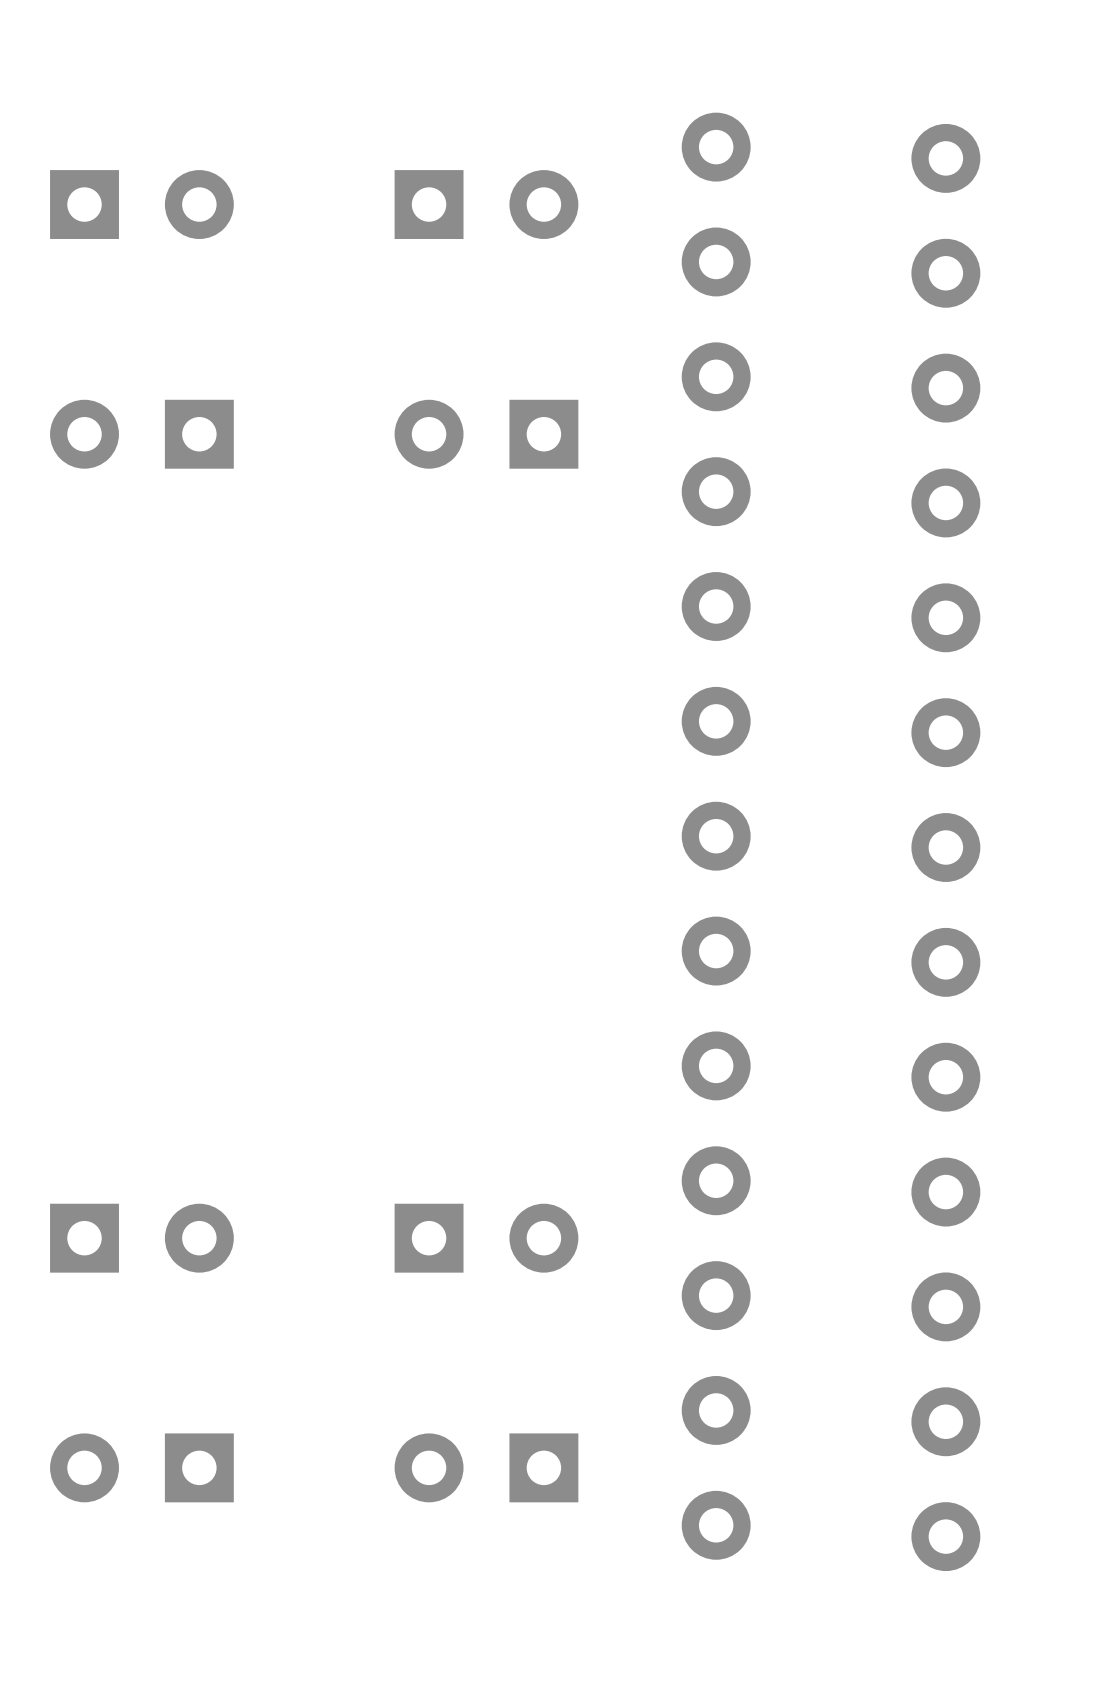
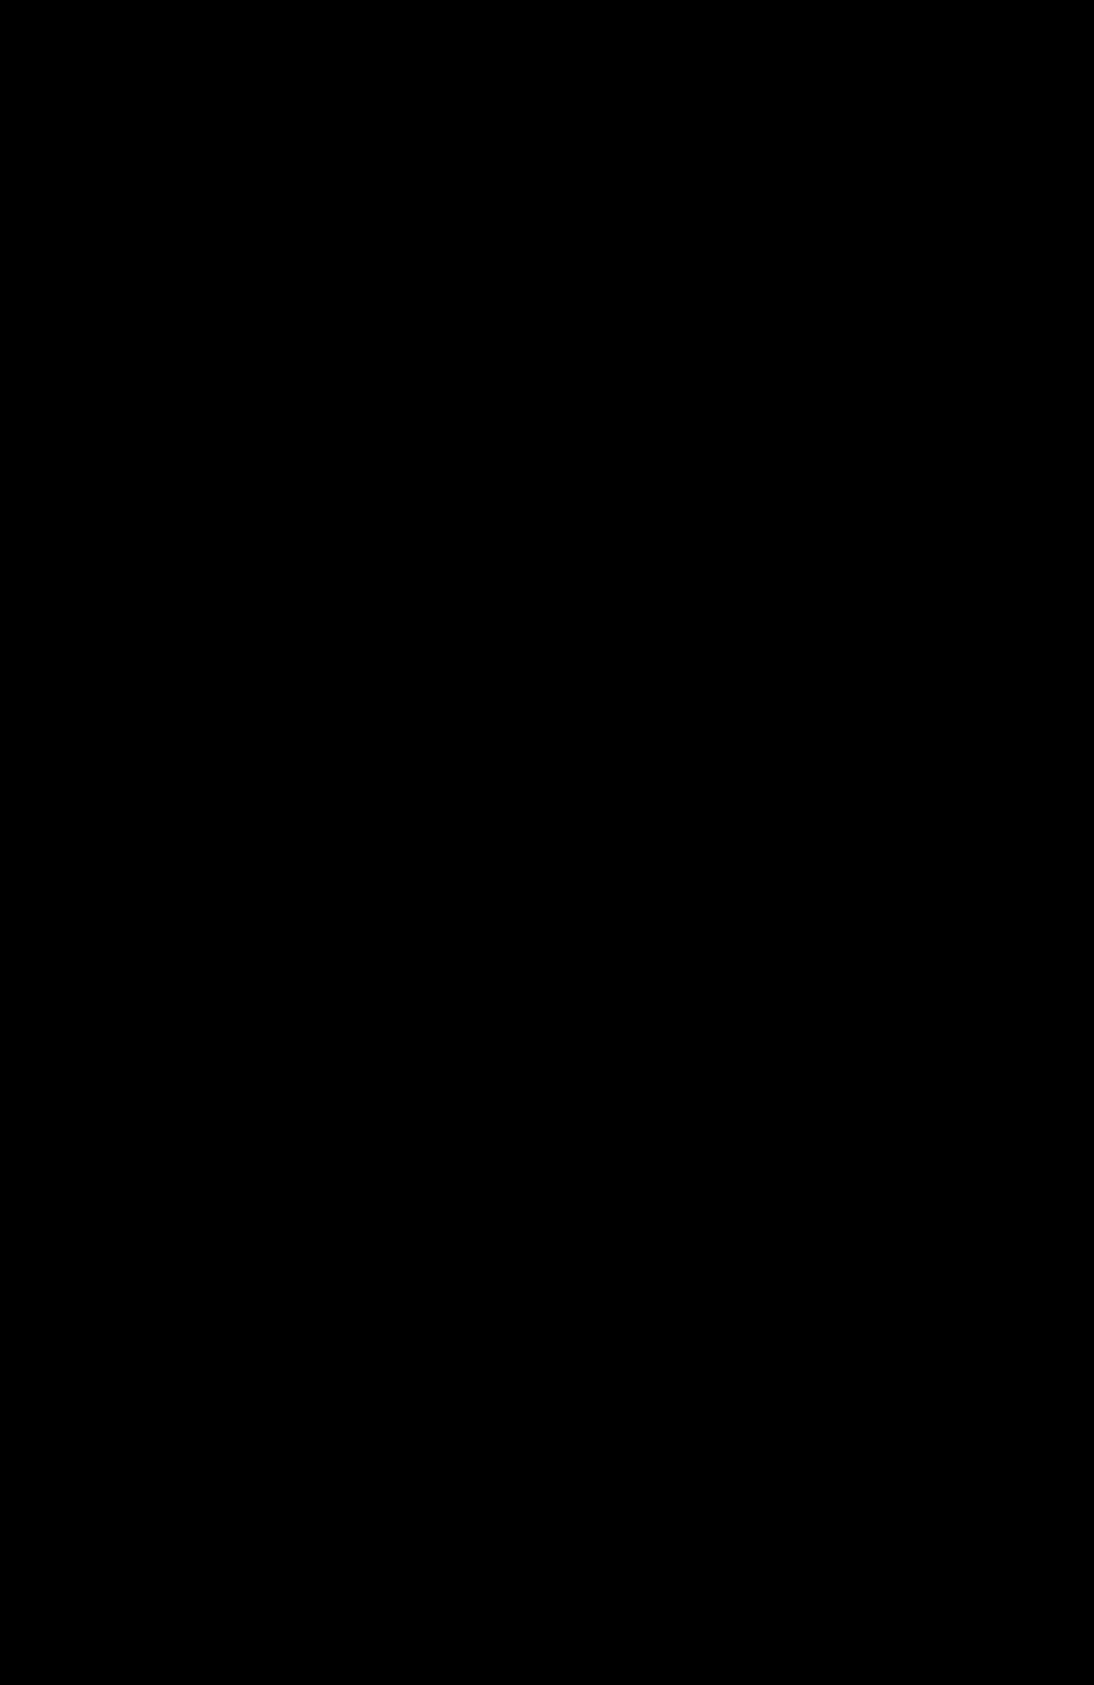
part: (141, 204) -> none
part: (486, 204) -> none
part: (141, 434) -> none
part: (486, 434) -> none
part: (716, 836) -> none
part: (945, 847) -> none
part: (141, 1238) -> none
part: (486, 1238) -> none
part: (141, 1467) -> none
part: (486, 1467) -> none

